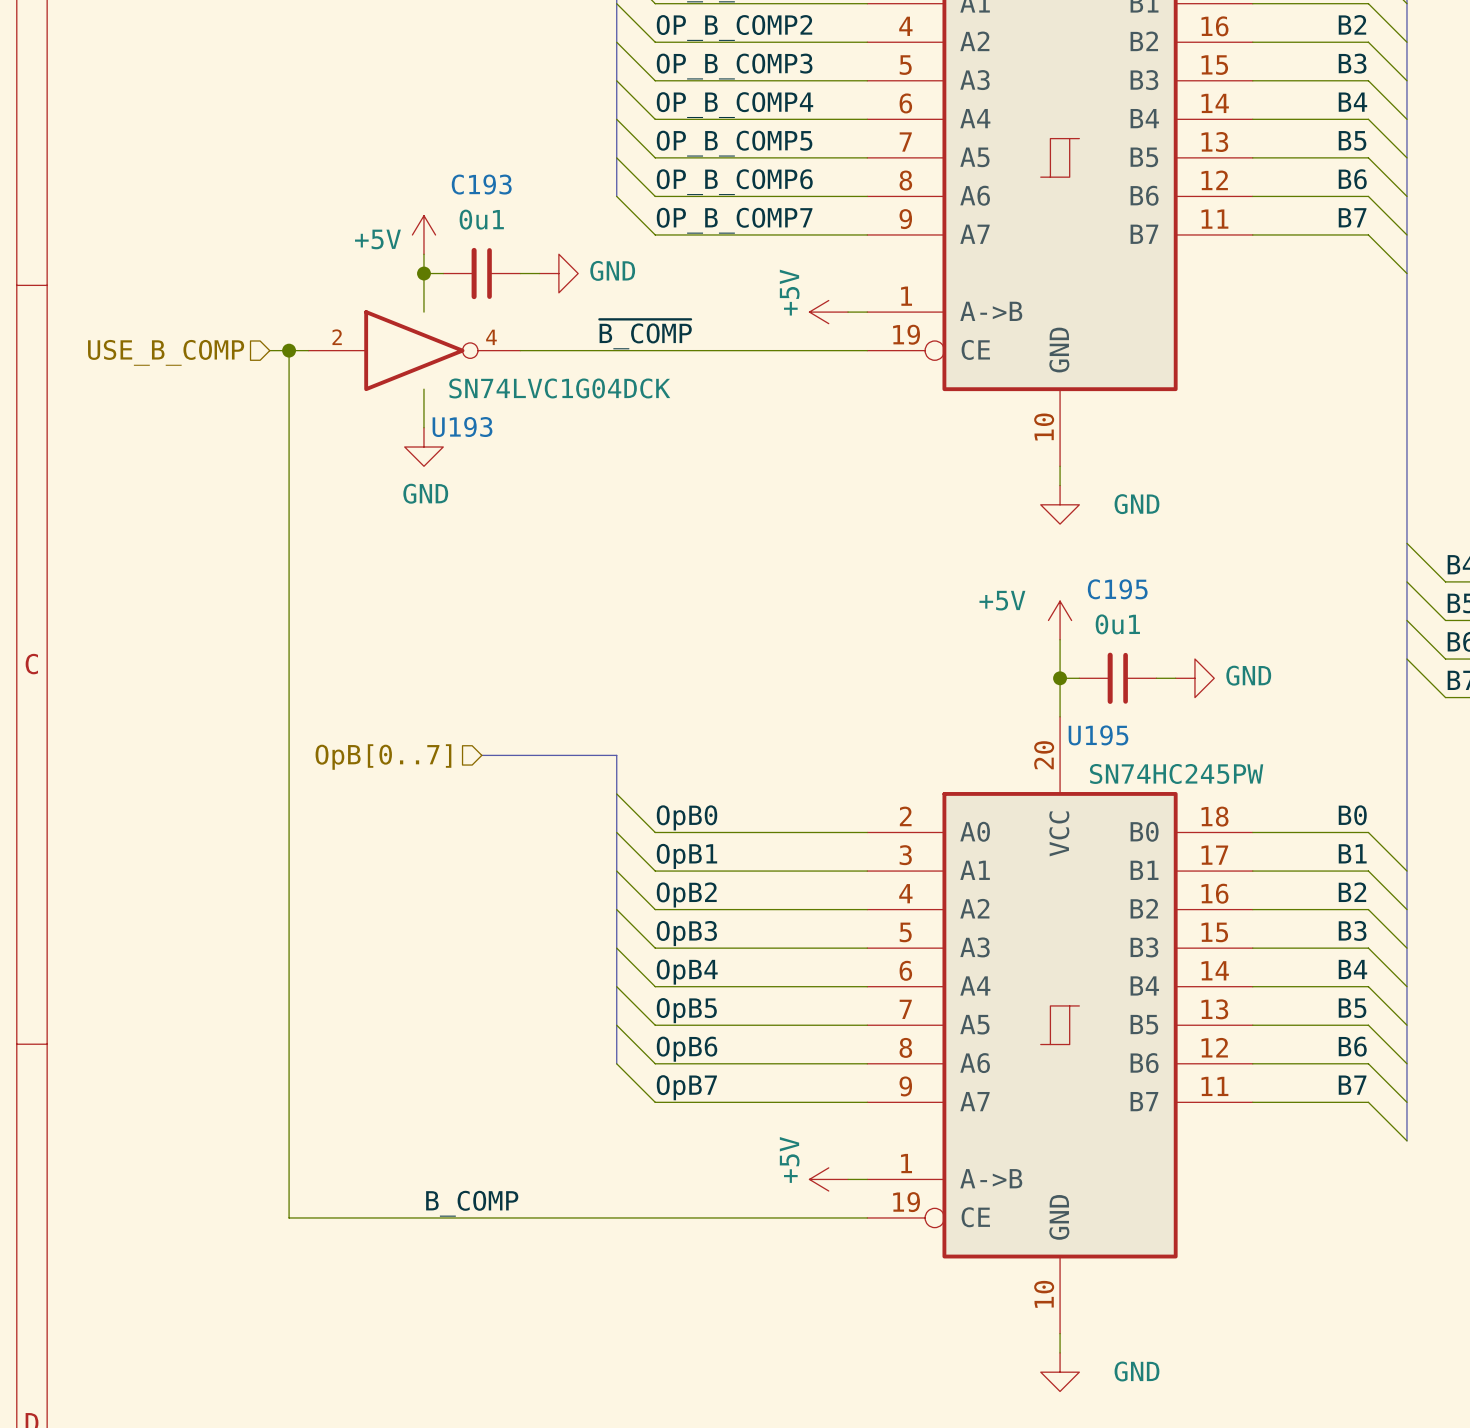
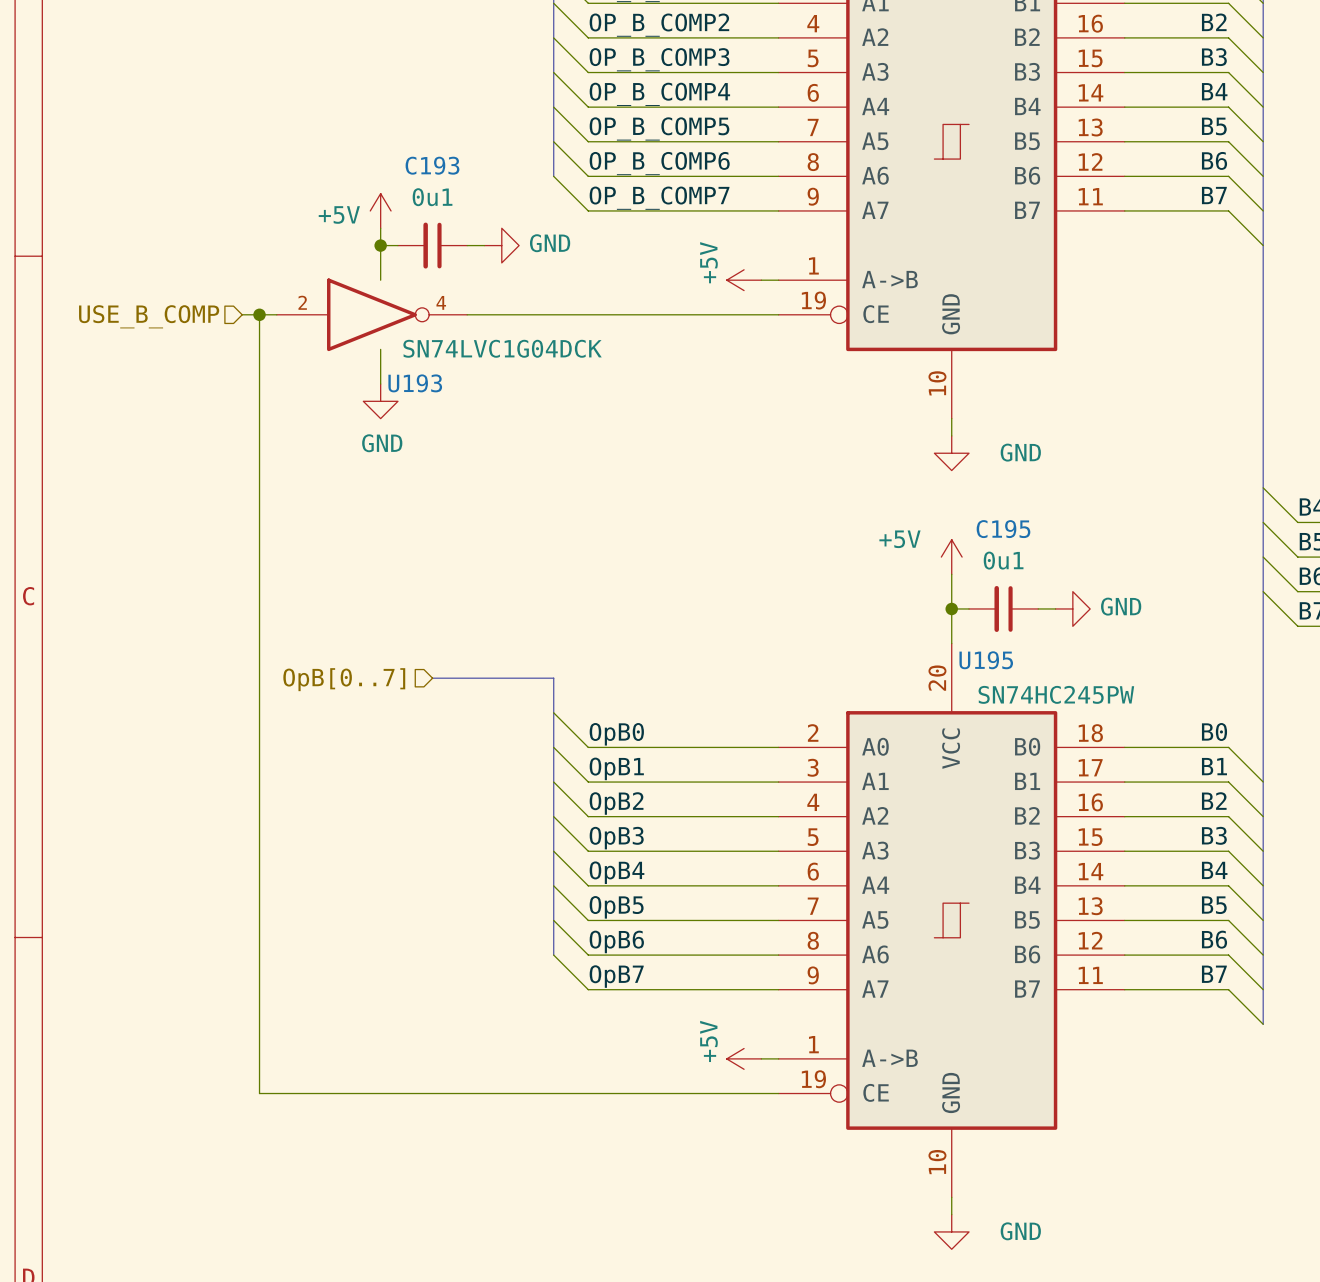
label: ~{B_COMP} (645, 334) -> none
label: B_COMP (472, 1203) -> none

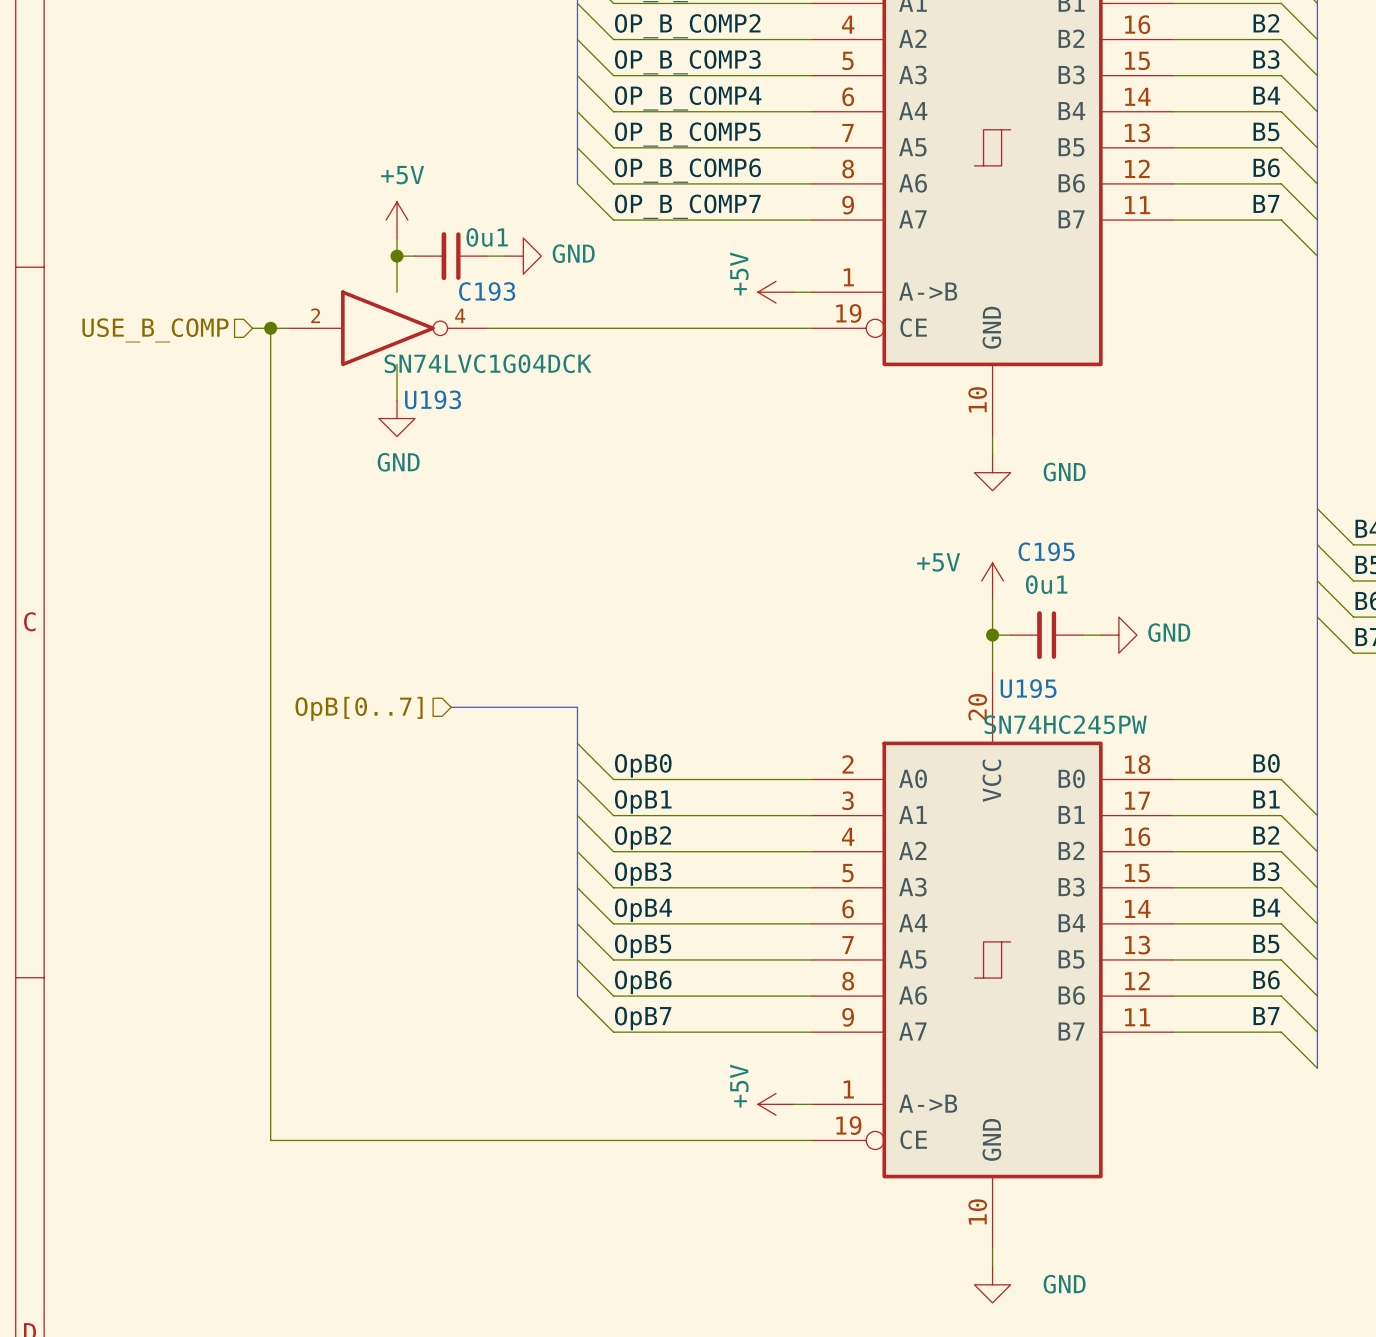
C193 name position: C193 (432, 165) -> C193 (487, 291)
C193 value position: 0u1 (432, 197) -> 0u1 (487, 237)
power symbol text position: +5V (339, 214) -> +5V (402, 175)
U193 value position: SN74LVC1G04DCK (502, 348) -> SN74LVC1G04DCK (488, 363)
U195 value position: SN74HC245PW (1056, 694) -> SN74HC245PW (1065, 724)

